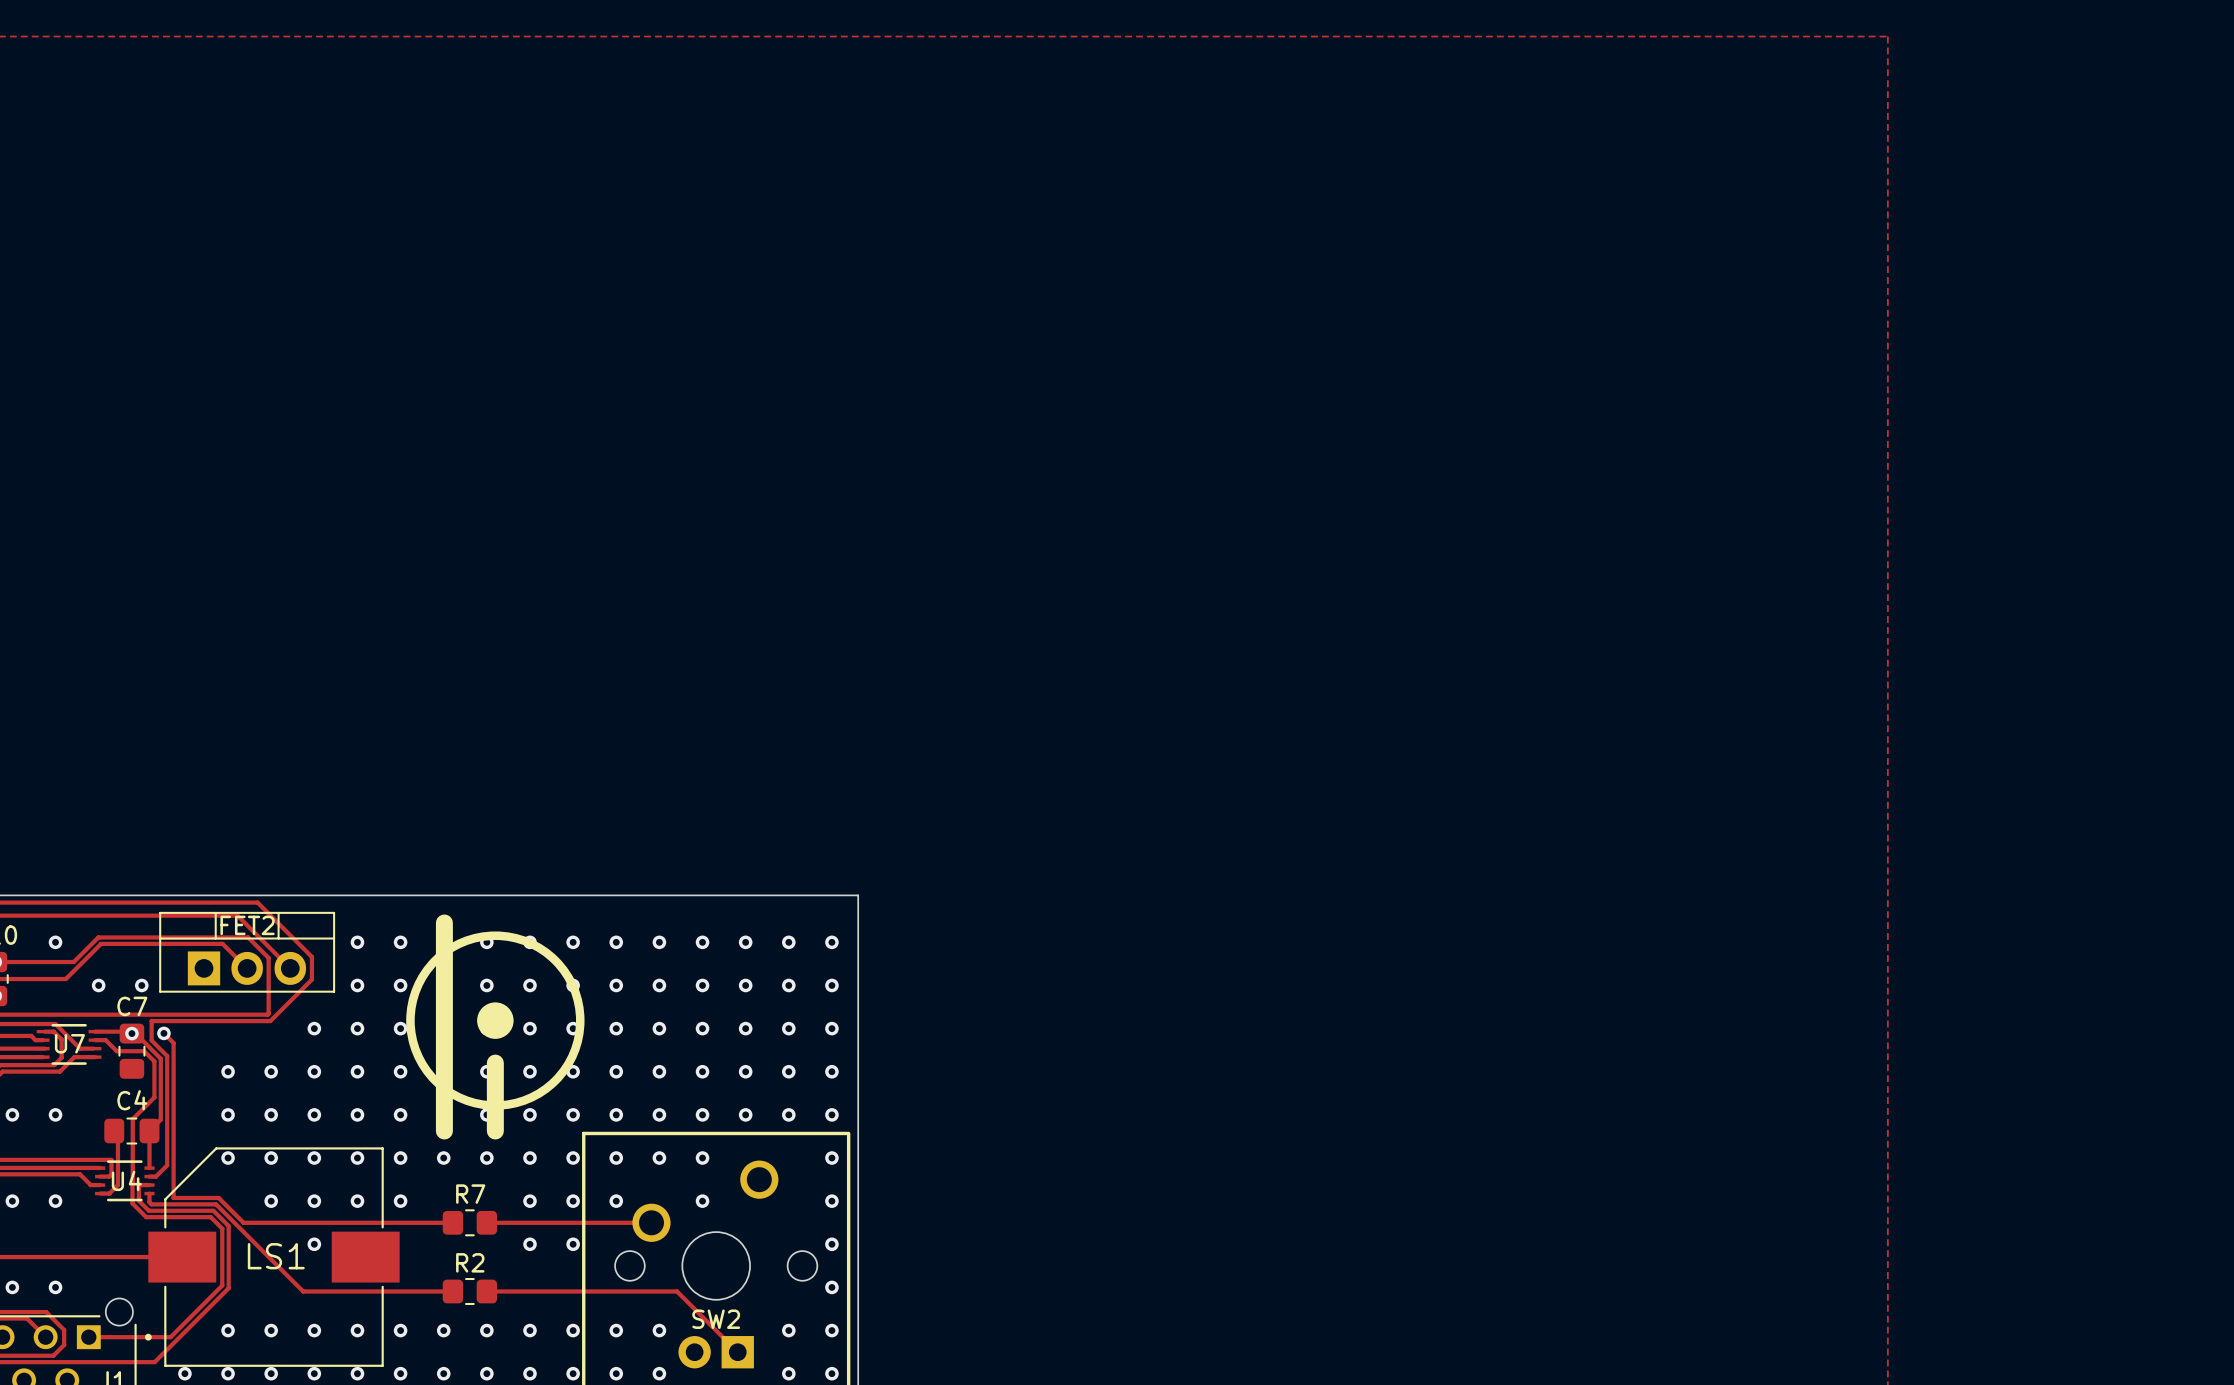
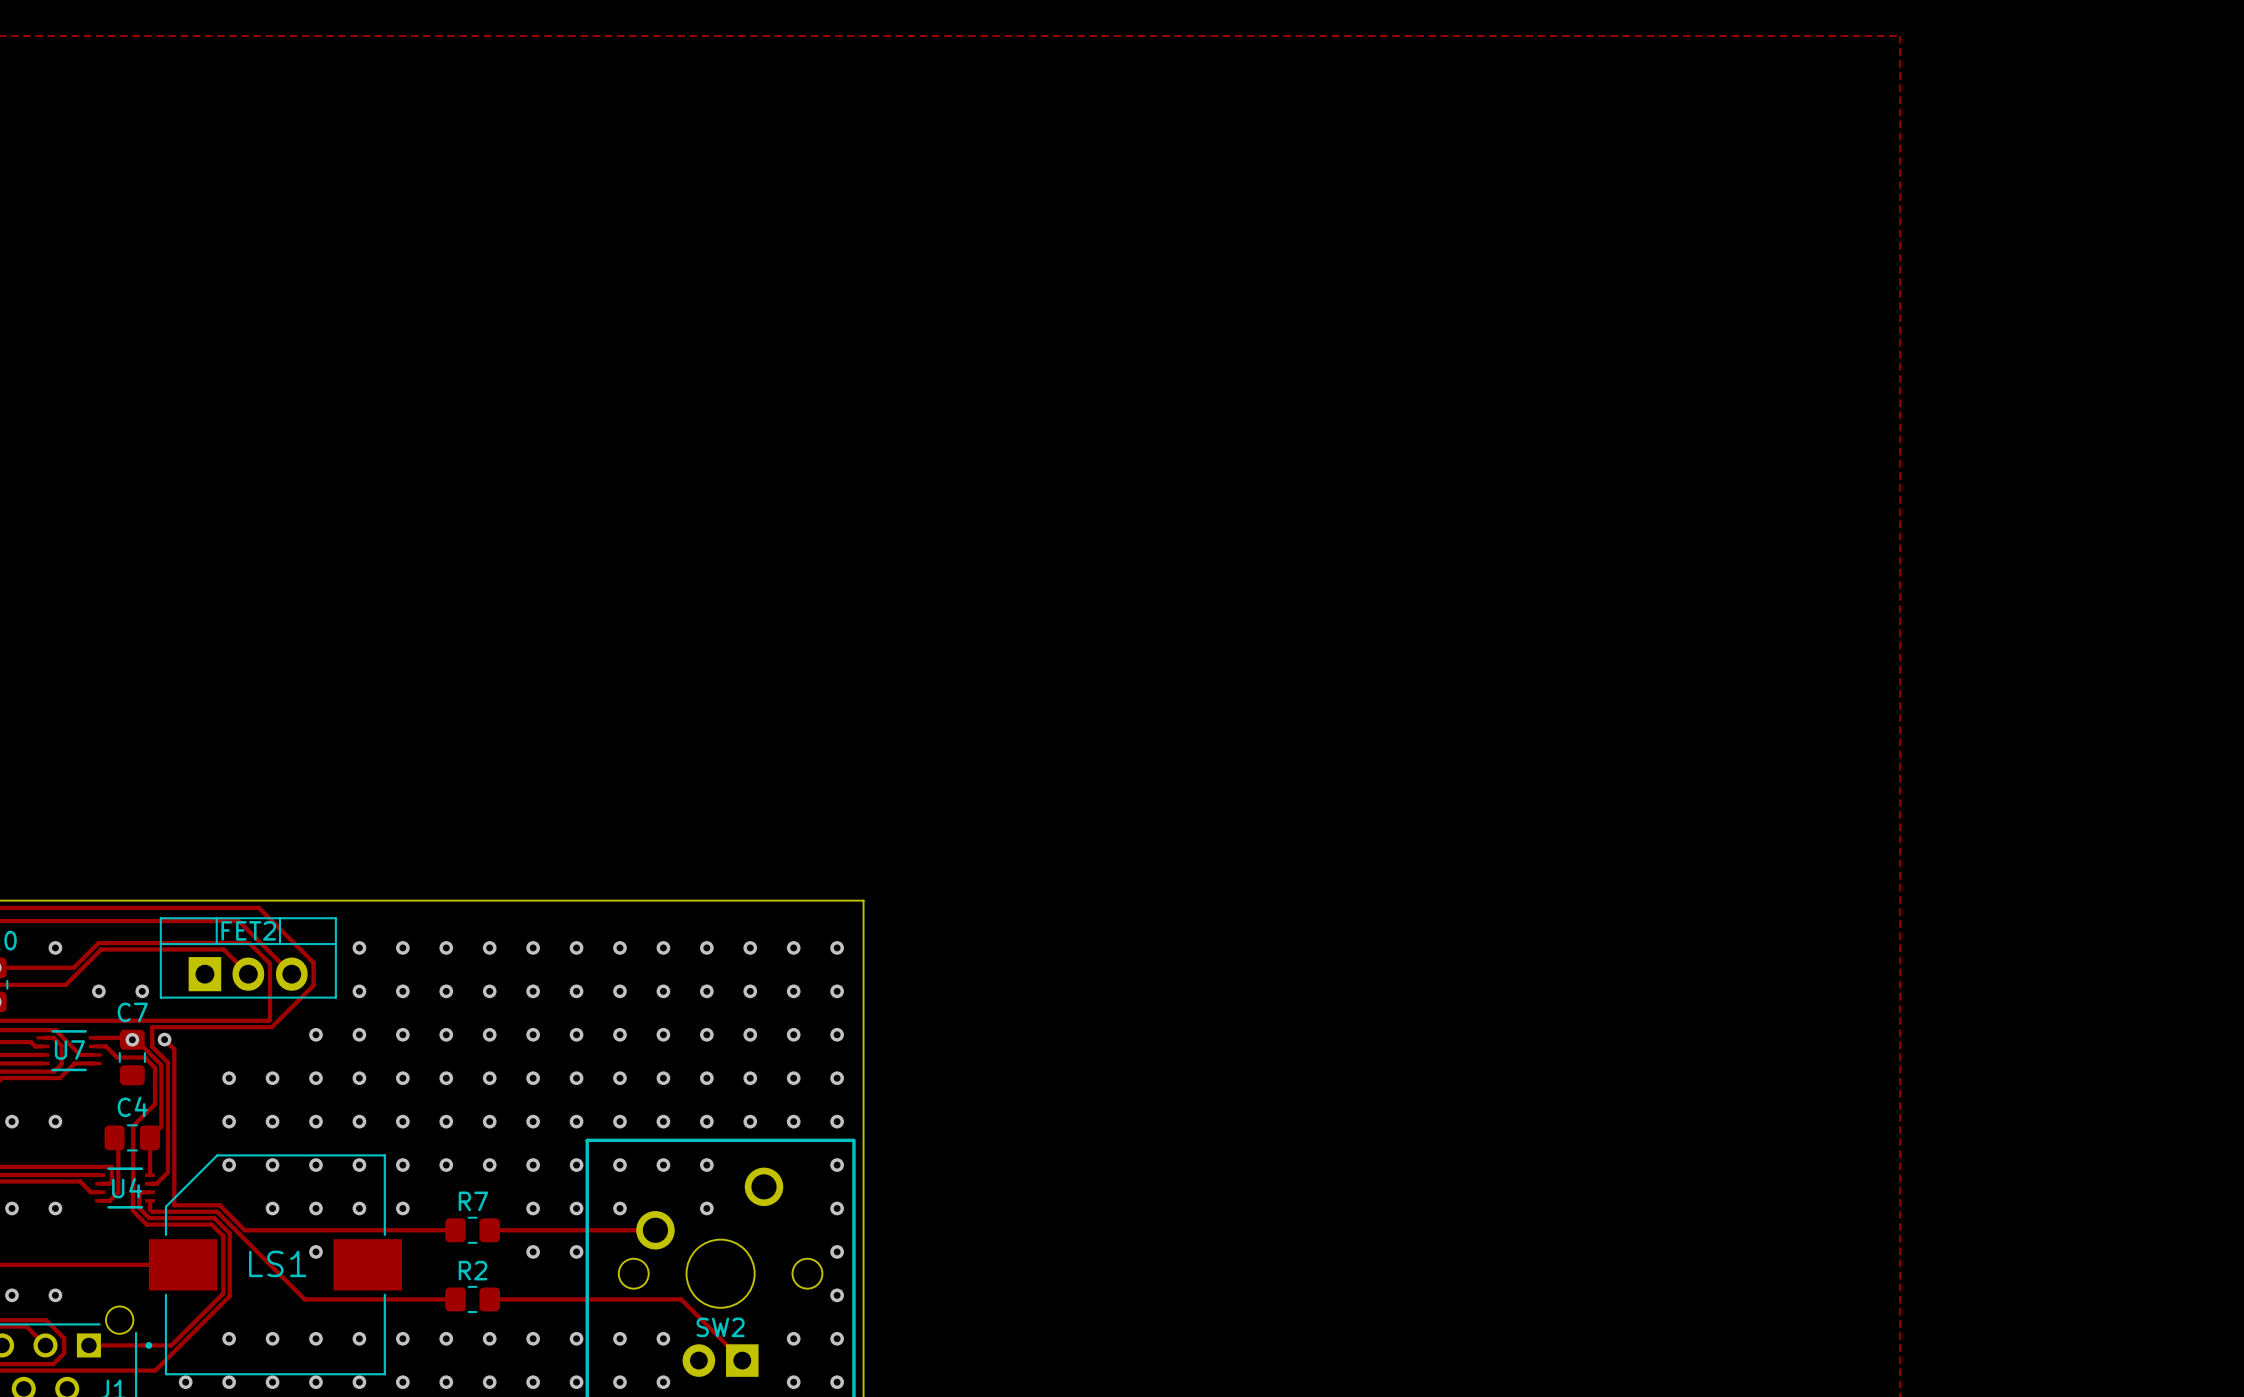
line: (444, 922) (444, 1131) -> none
drawing: [406, 931, 585, 1110] -> none
line: (495, 1063) (495, 1131) -> none

